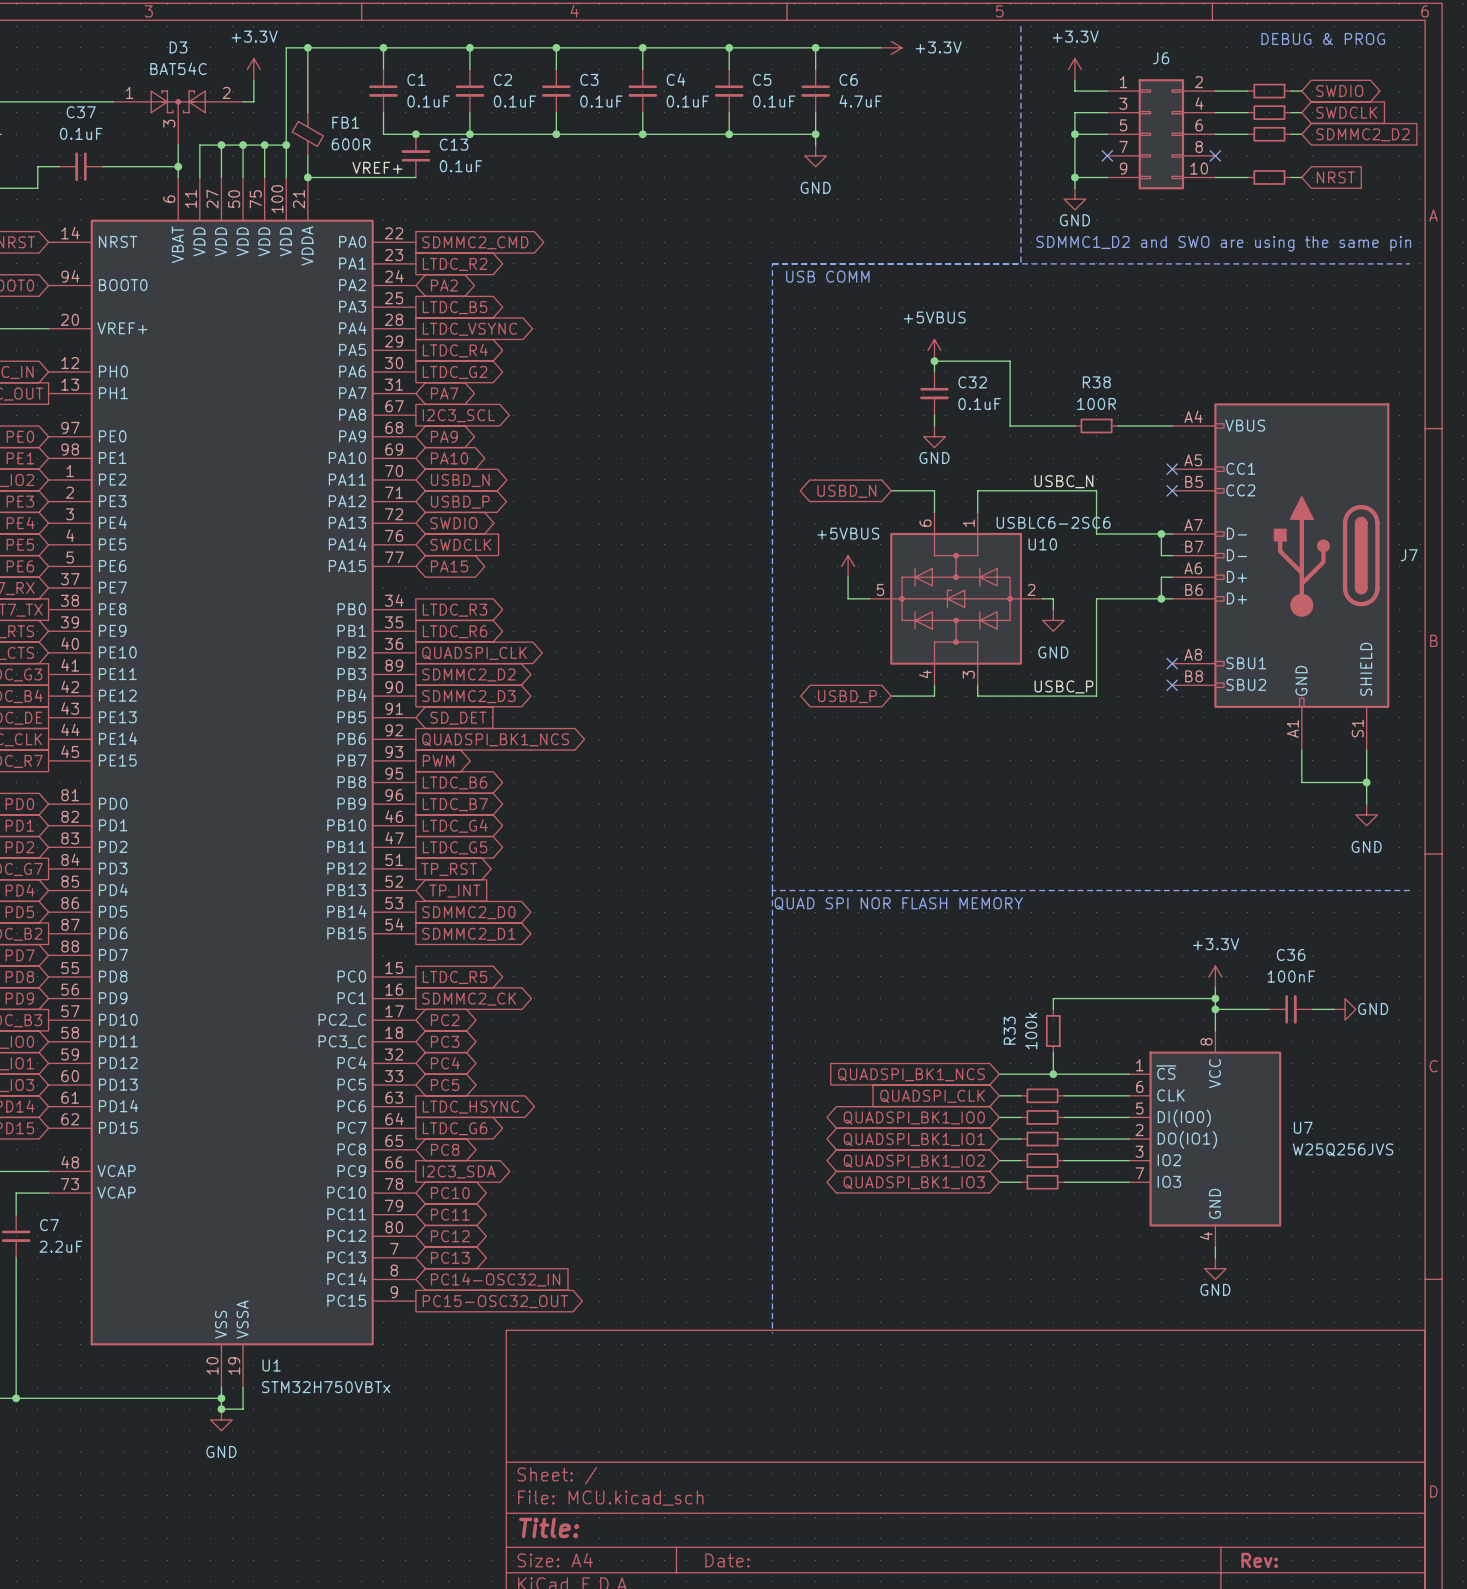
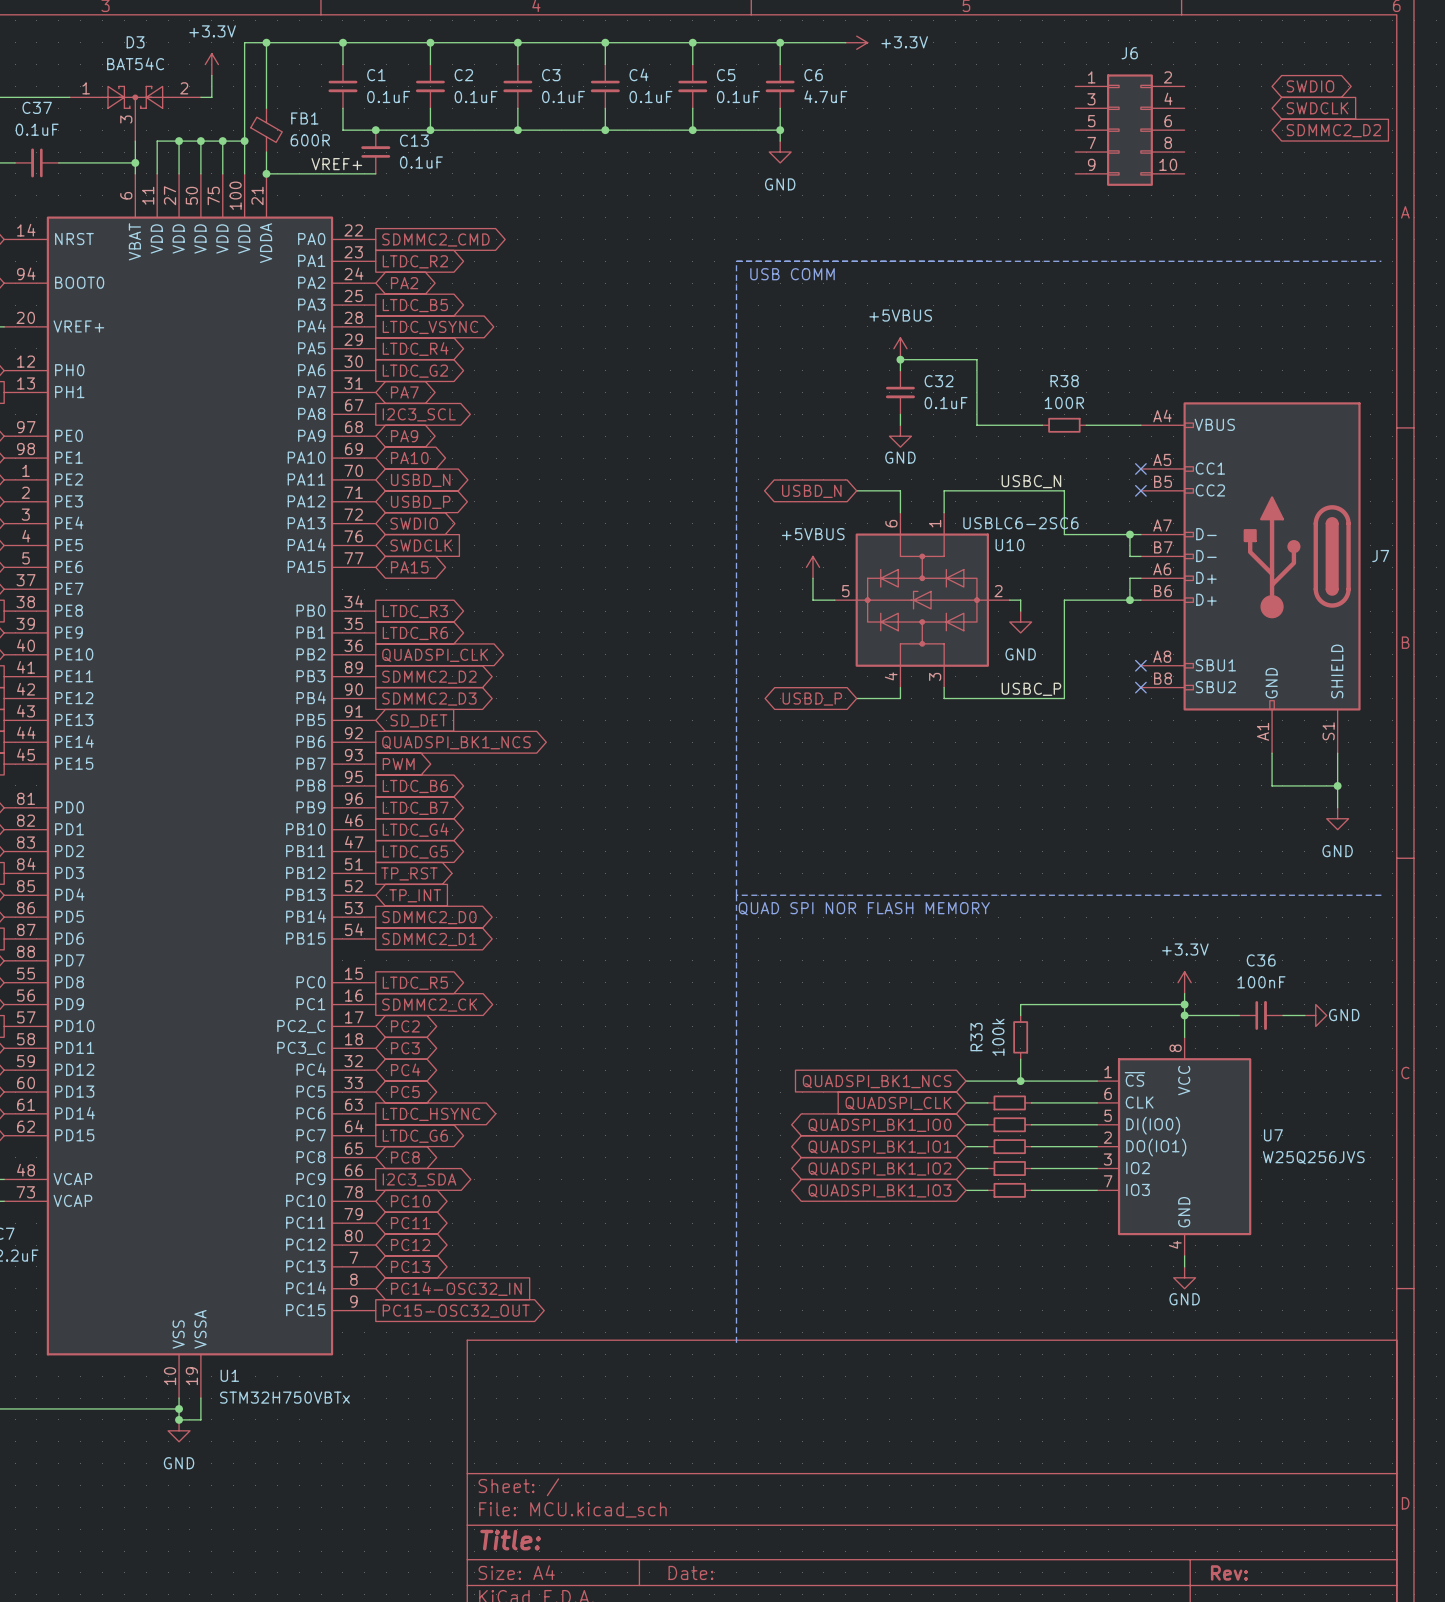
line: (1020, 26) (1020, 263) -> none
text: DEBUG & PROG (1323, 38) -> none
power symbol: +3.3V (1074, 69) -> none
wire: (1074, 80) (1074, 91) (1107, 91) -> none
wire: (1215, 91) (1247, 91) -> none
part: (1269, 91) -> none
wire: (1291, 91) (1301, 91) -> none
wire: (1107, 112) (1074, 112) (1074, 188) -> none
wire: (1215, 112) (1247, 112) -> none
part: (1269, 112) -> none
wire: (1291, 112) (1301, 112) -> none
wire: (1074, 134) (1107, 134) -> none
junction: (1074, 134) -> none
wire: (1215, 134) (1247, 134) -> none
part: (1269, 134) -> none
wire: (1291, 134) (1301, 134) -> none
no-connect mark: (1107, 155) -> none
no-connect mark: (1215, 155) -> none
wire: (1074, 177) (1107, 177) -> none
junction: (1074, 177) -> none
wire: (1215, 177) (1247, 177) -> none
part: (1269, 177) -> none
wire: (1291, 177) (1301, 177) -> none
global label: NRST (1335, 177) -> none
power symbol: GND (1074, 199) -> none
text: SDMMC1_D2 and SWO are using the same pin (1223, 243) -> none

